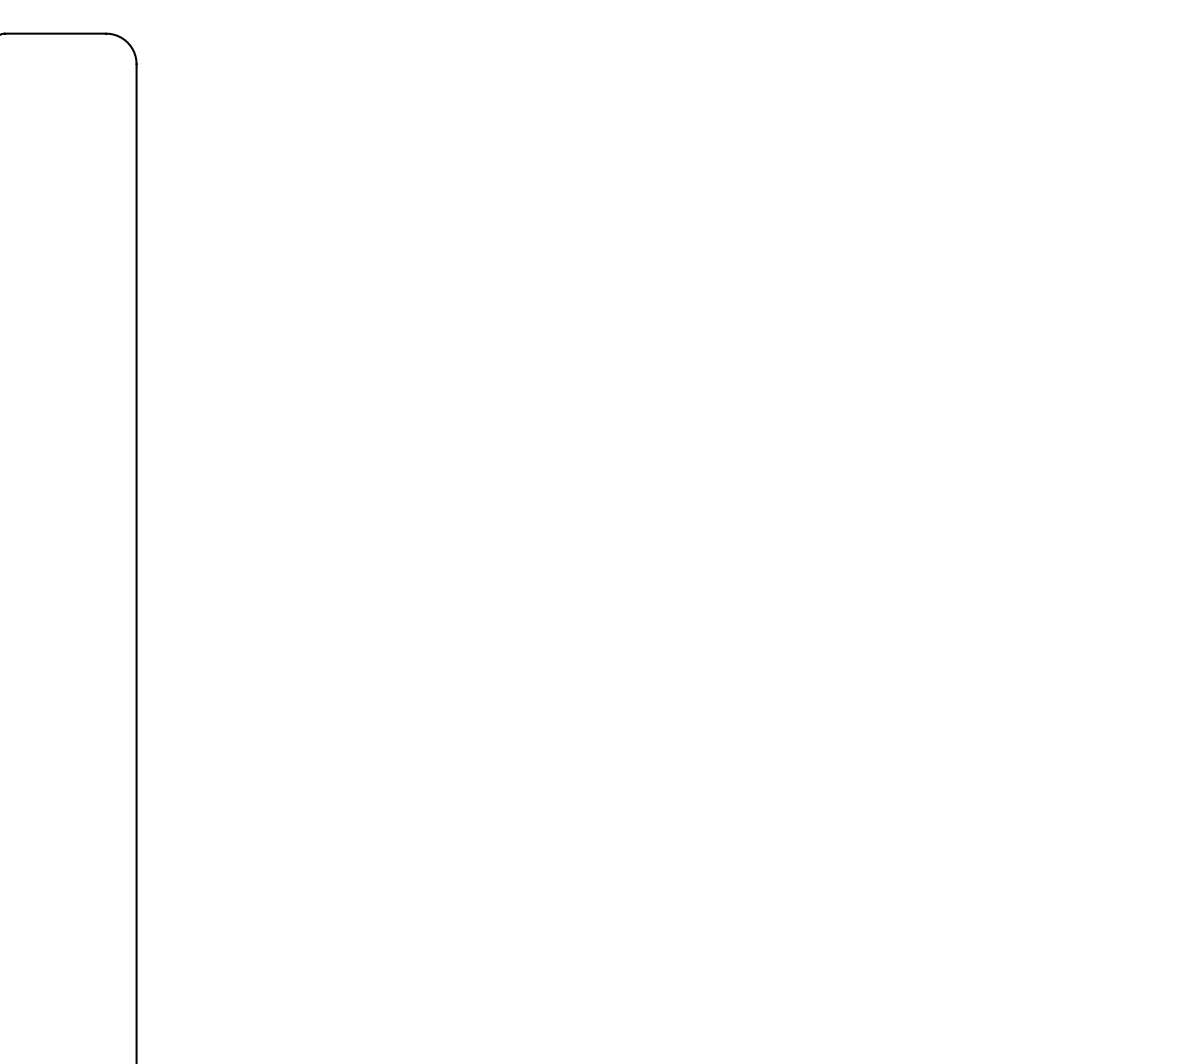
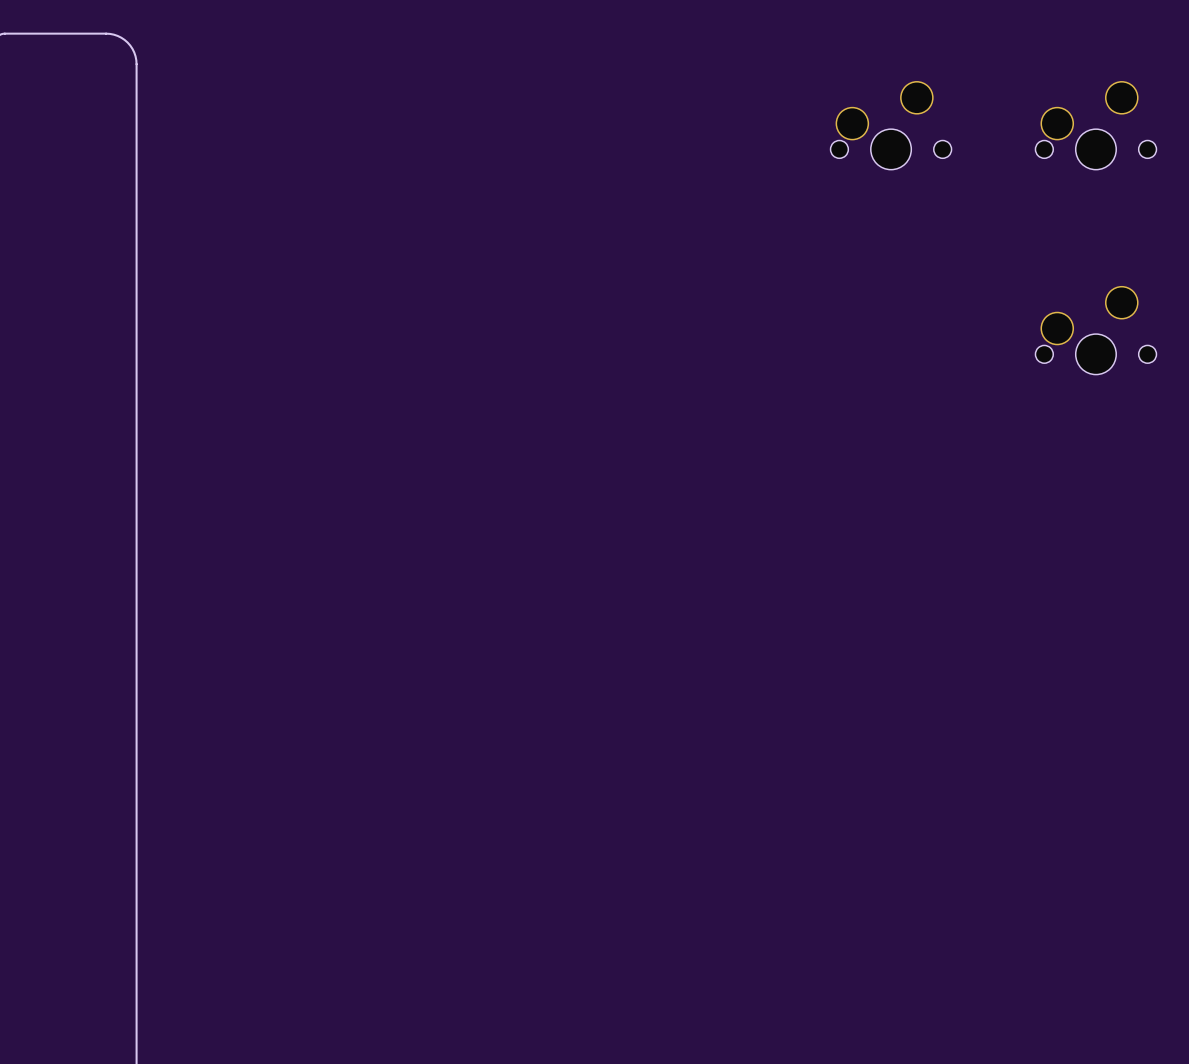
part: none -> (891, 125)
part: none -> (1095, 125)
part: none -> (1095, 330)

